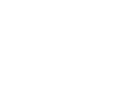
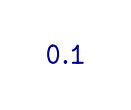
text: none -> 0.1 (65, 54)

